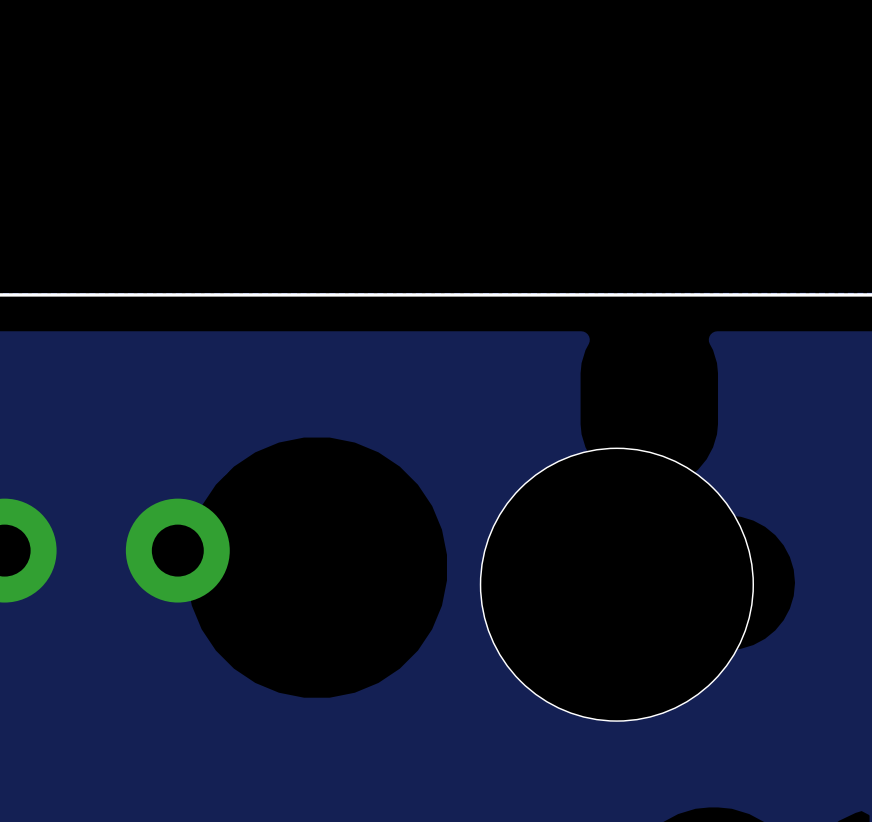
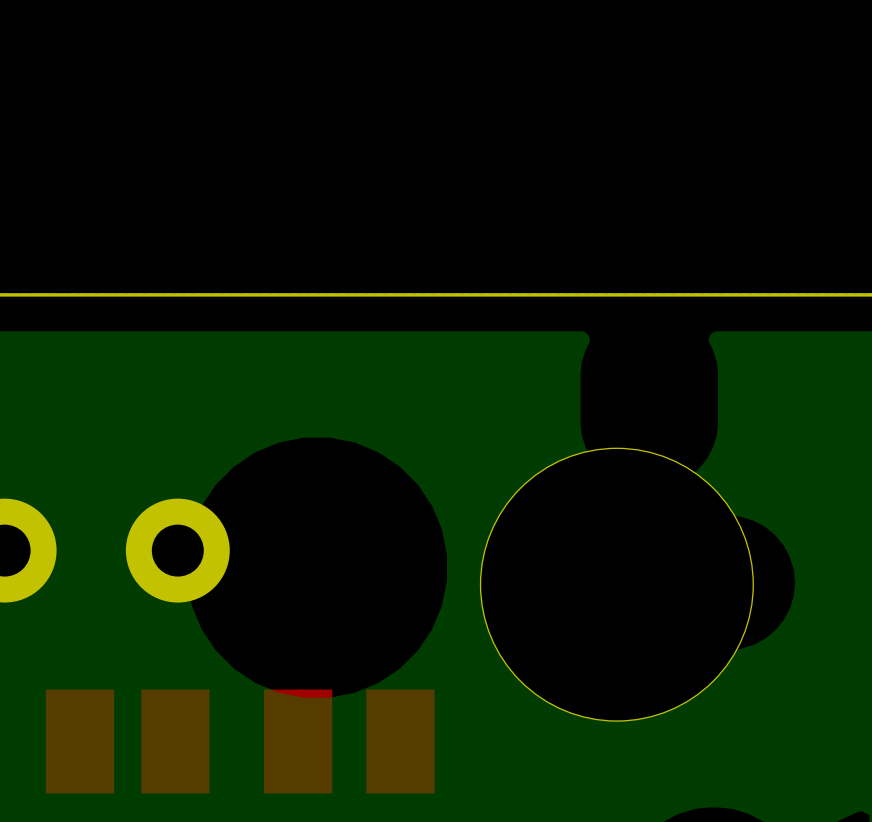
part: none -> (79, 741)
part: none -> (175, 741)
part: none -> (298, 741)
part: none -> (400, 741)

